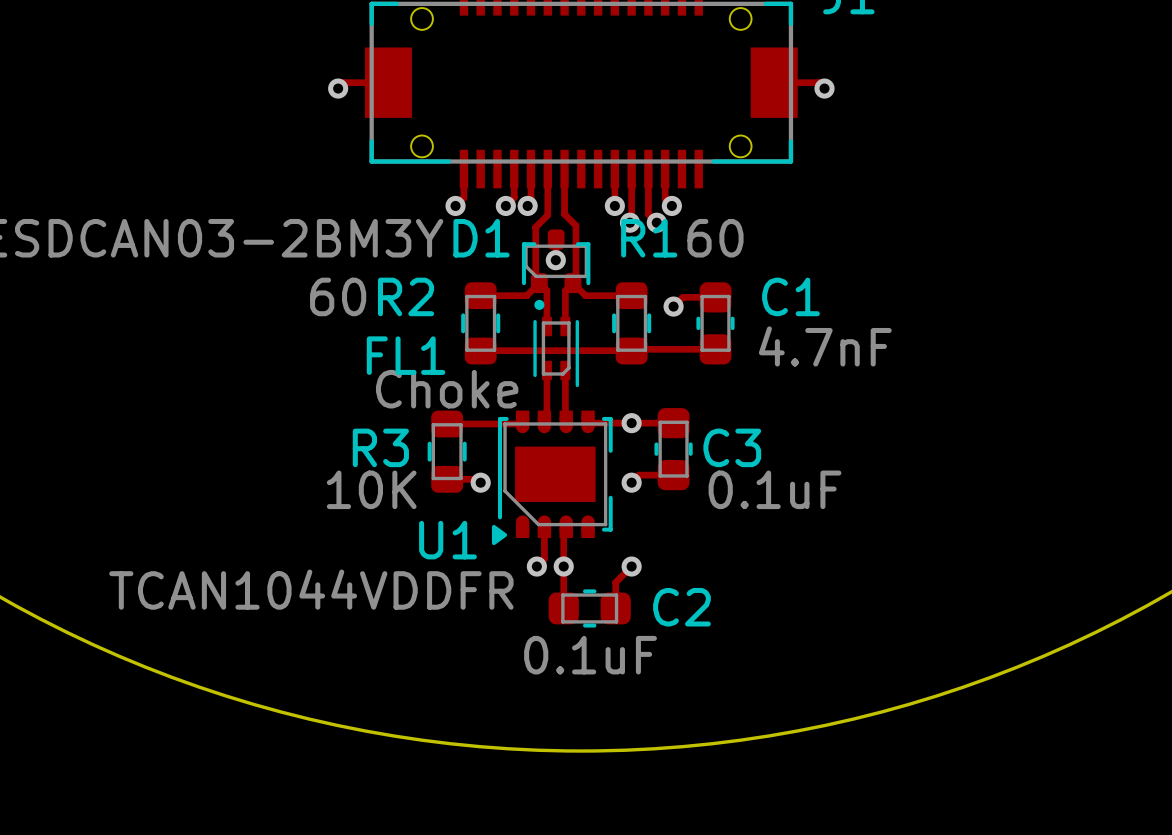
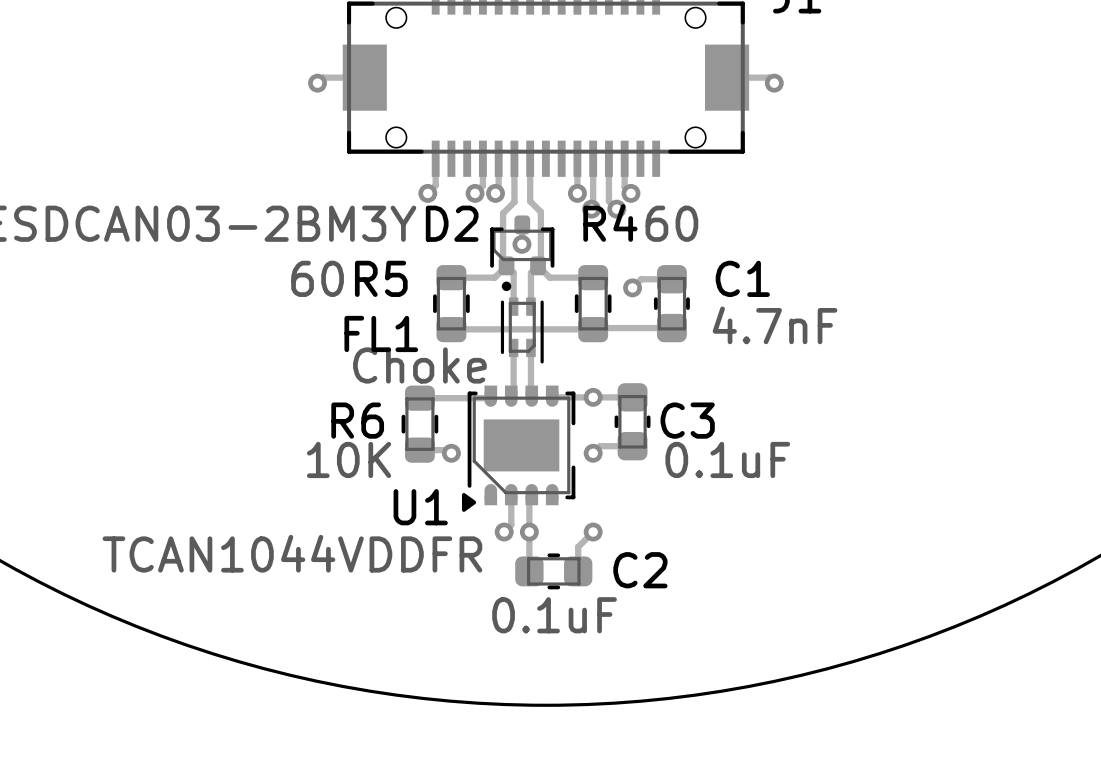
D1 name: D1 (481, 238) -> D2 (452, 223)
R1 name: R1 (649, 238) -> R4 (610, 222)
R2 name: R2 (406, 296) -> R5 (381, 278)
R3 name: R3 (380, 447) -> R6 (357, 420)

